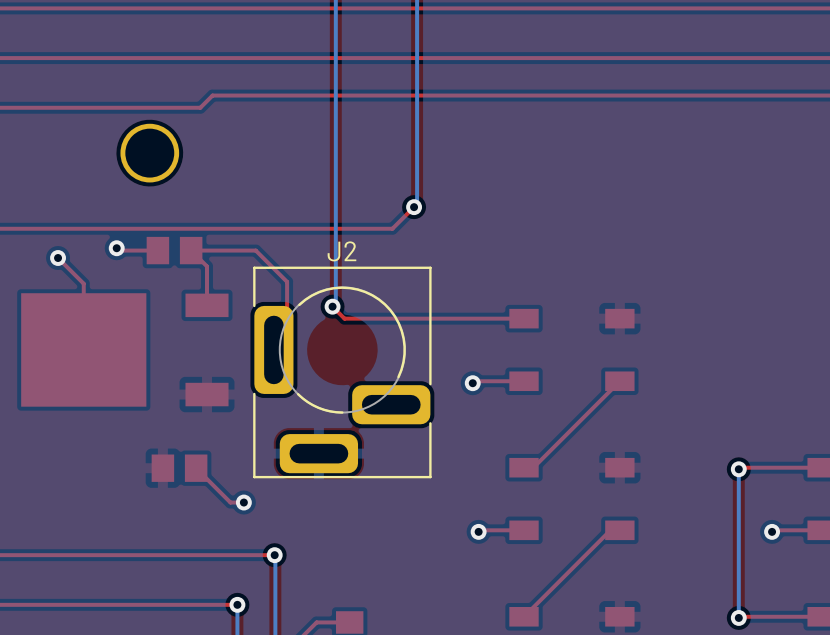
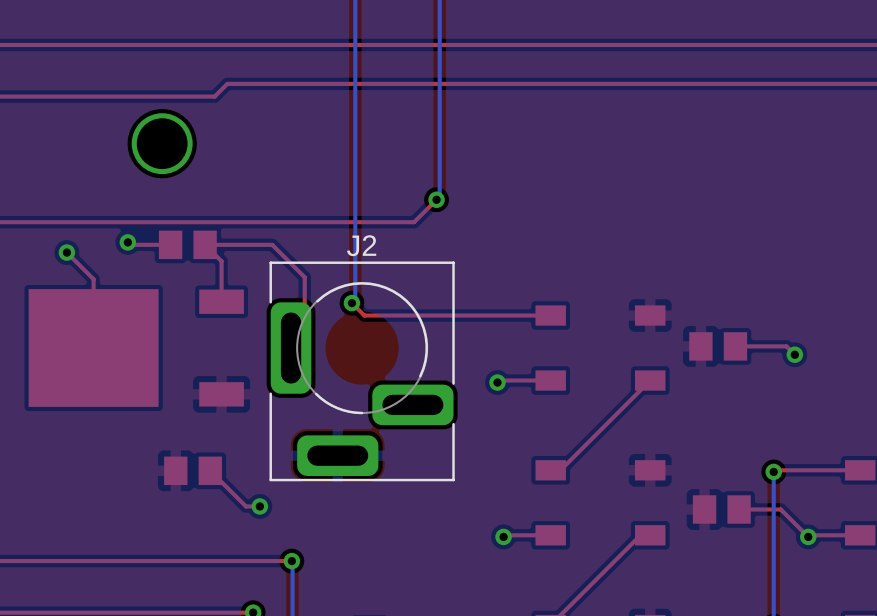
part: none -> (718, 346)
top track: none -> (735, 346) (786, 346) (794, 354)
via: none -> (794, 354)
part: none -> (721, 509)
top track: none -> (739, 509) (780, 509) (808, 536)

